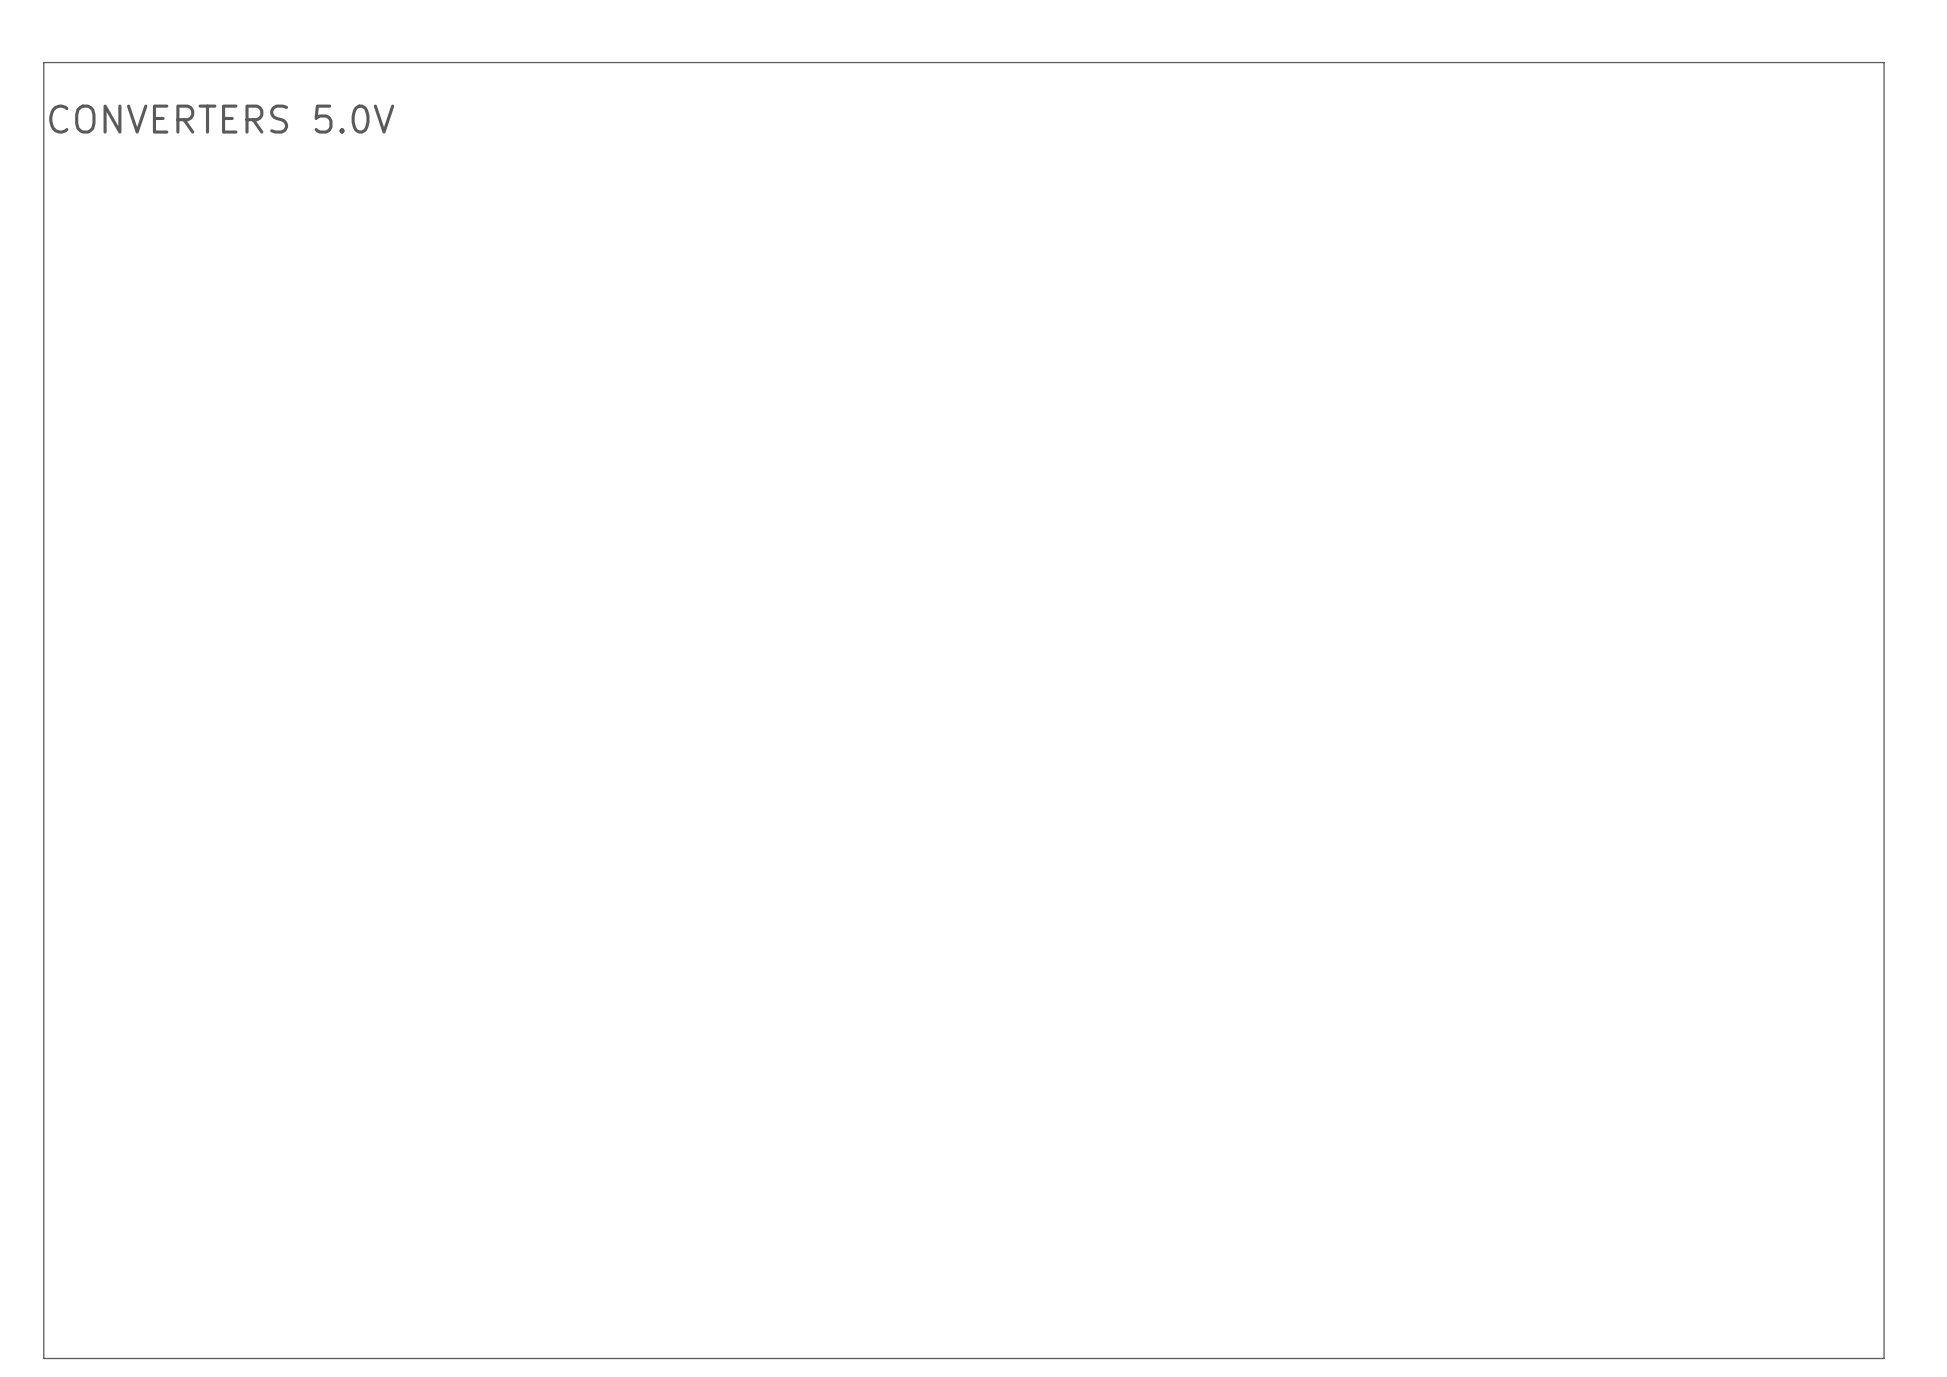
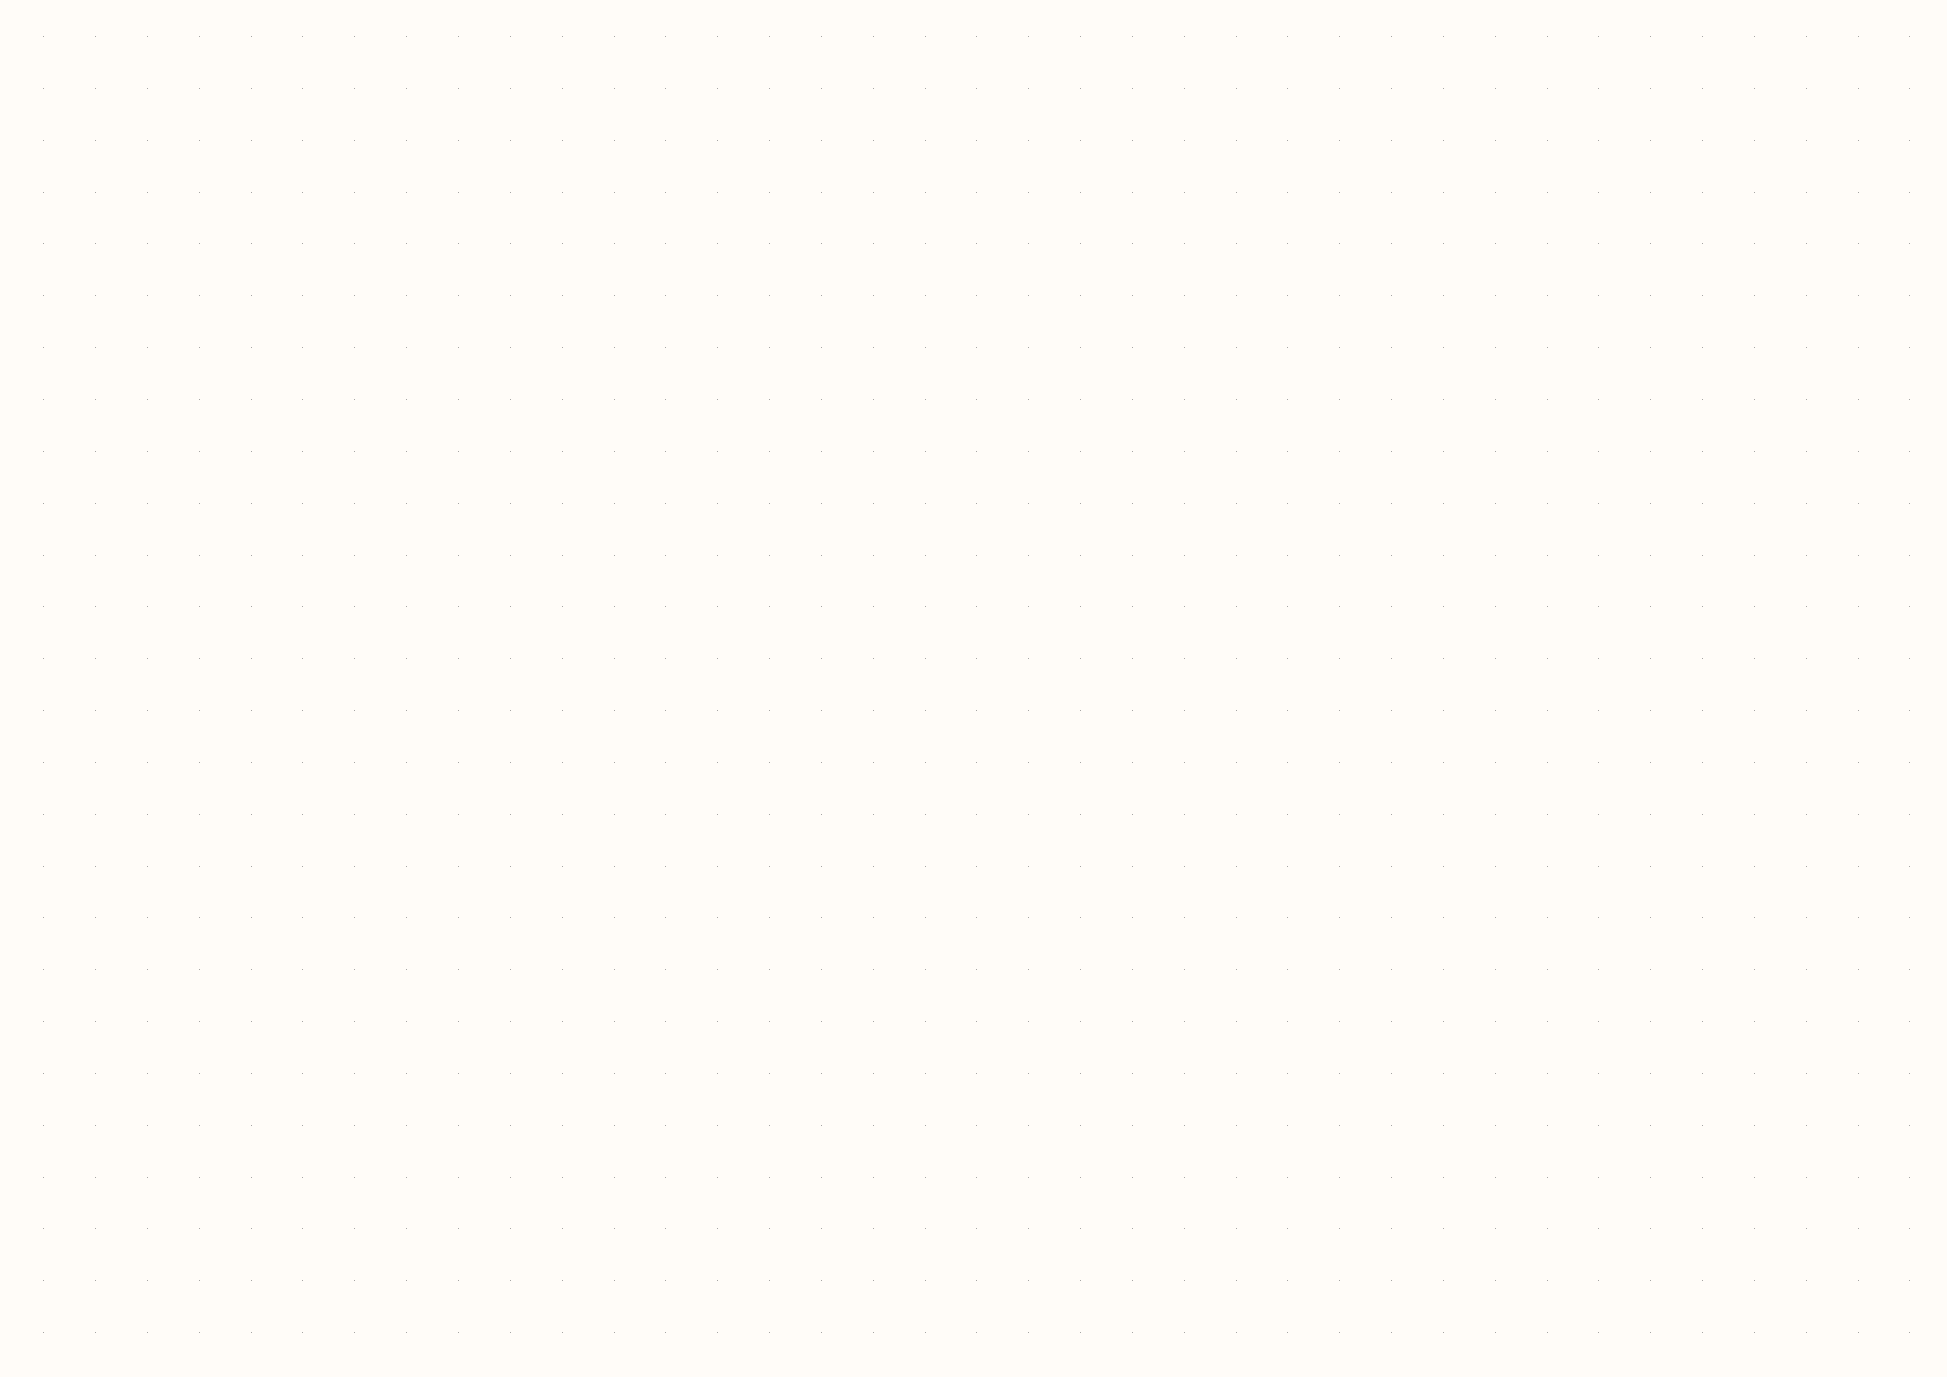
line: (43, 62) (1884, 62) (1884, 1358) (43, 1358) (43, 62) -> none
text: CONVERTERS 5.0V (221, 119) -> none

